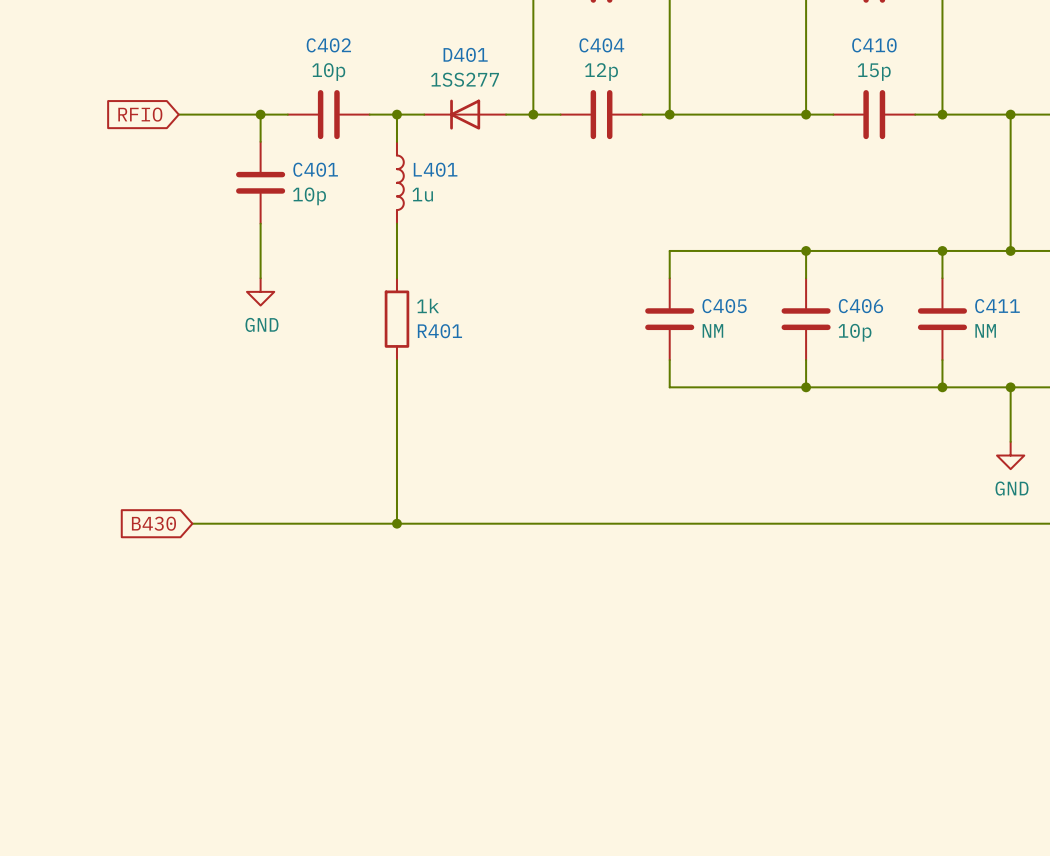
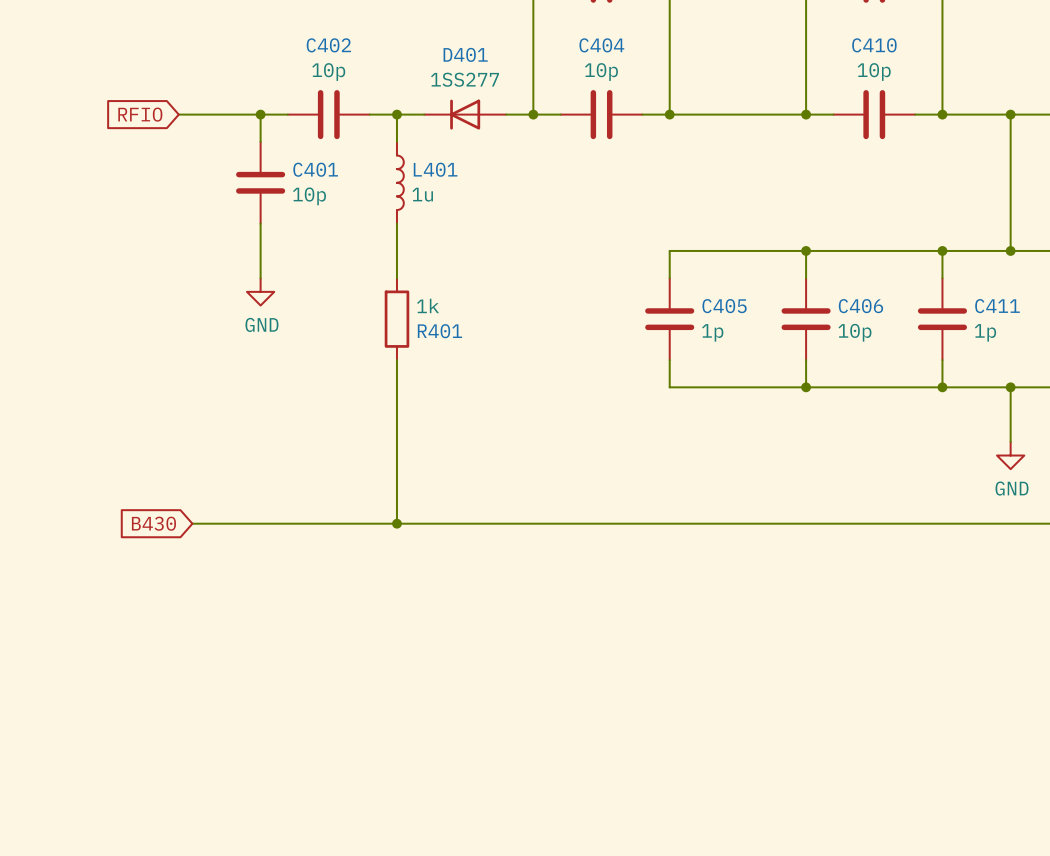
C404 value: 12p (601, 72) -> 10p (601, 72)
C410 value: 15p (874, 72) -> 10p (874, 72)
C405 value: NM (712, 330) -> 1p (712, 332)
C411 value: NM (985, 330) -> 1p (985, 332)

